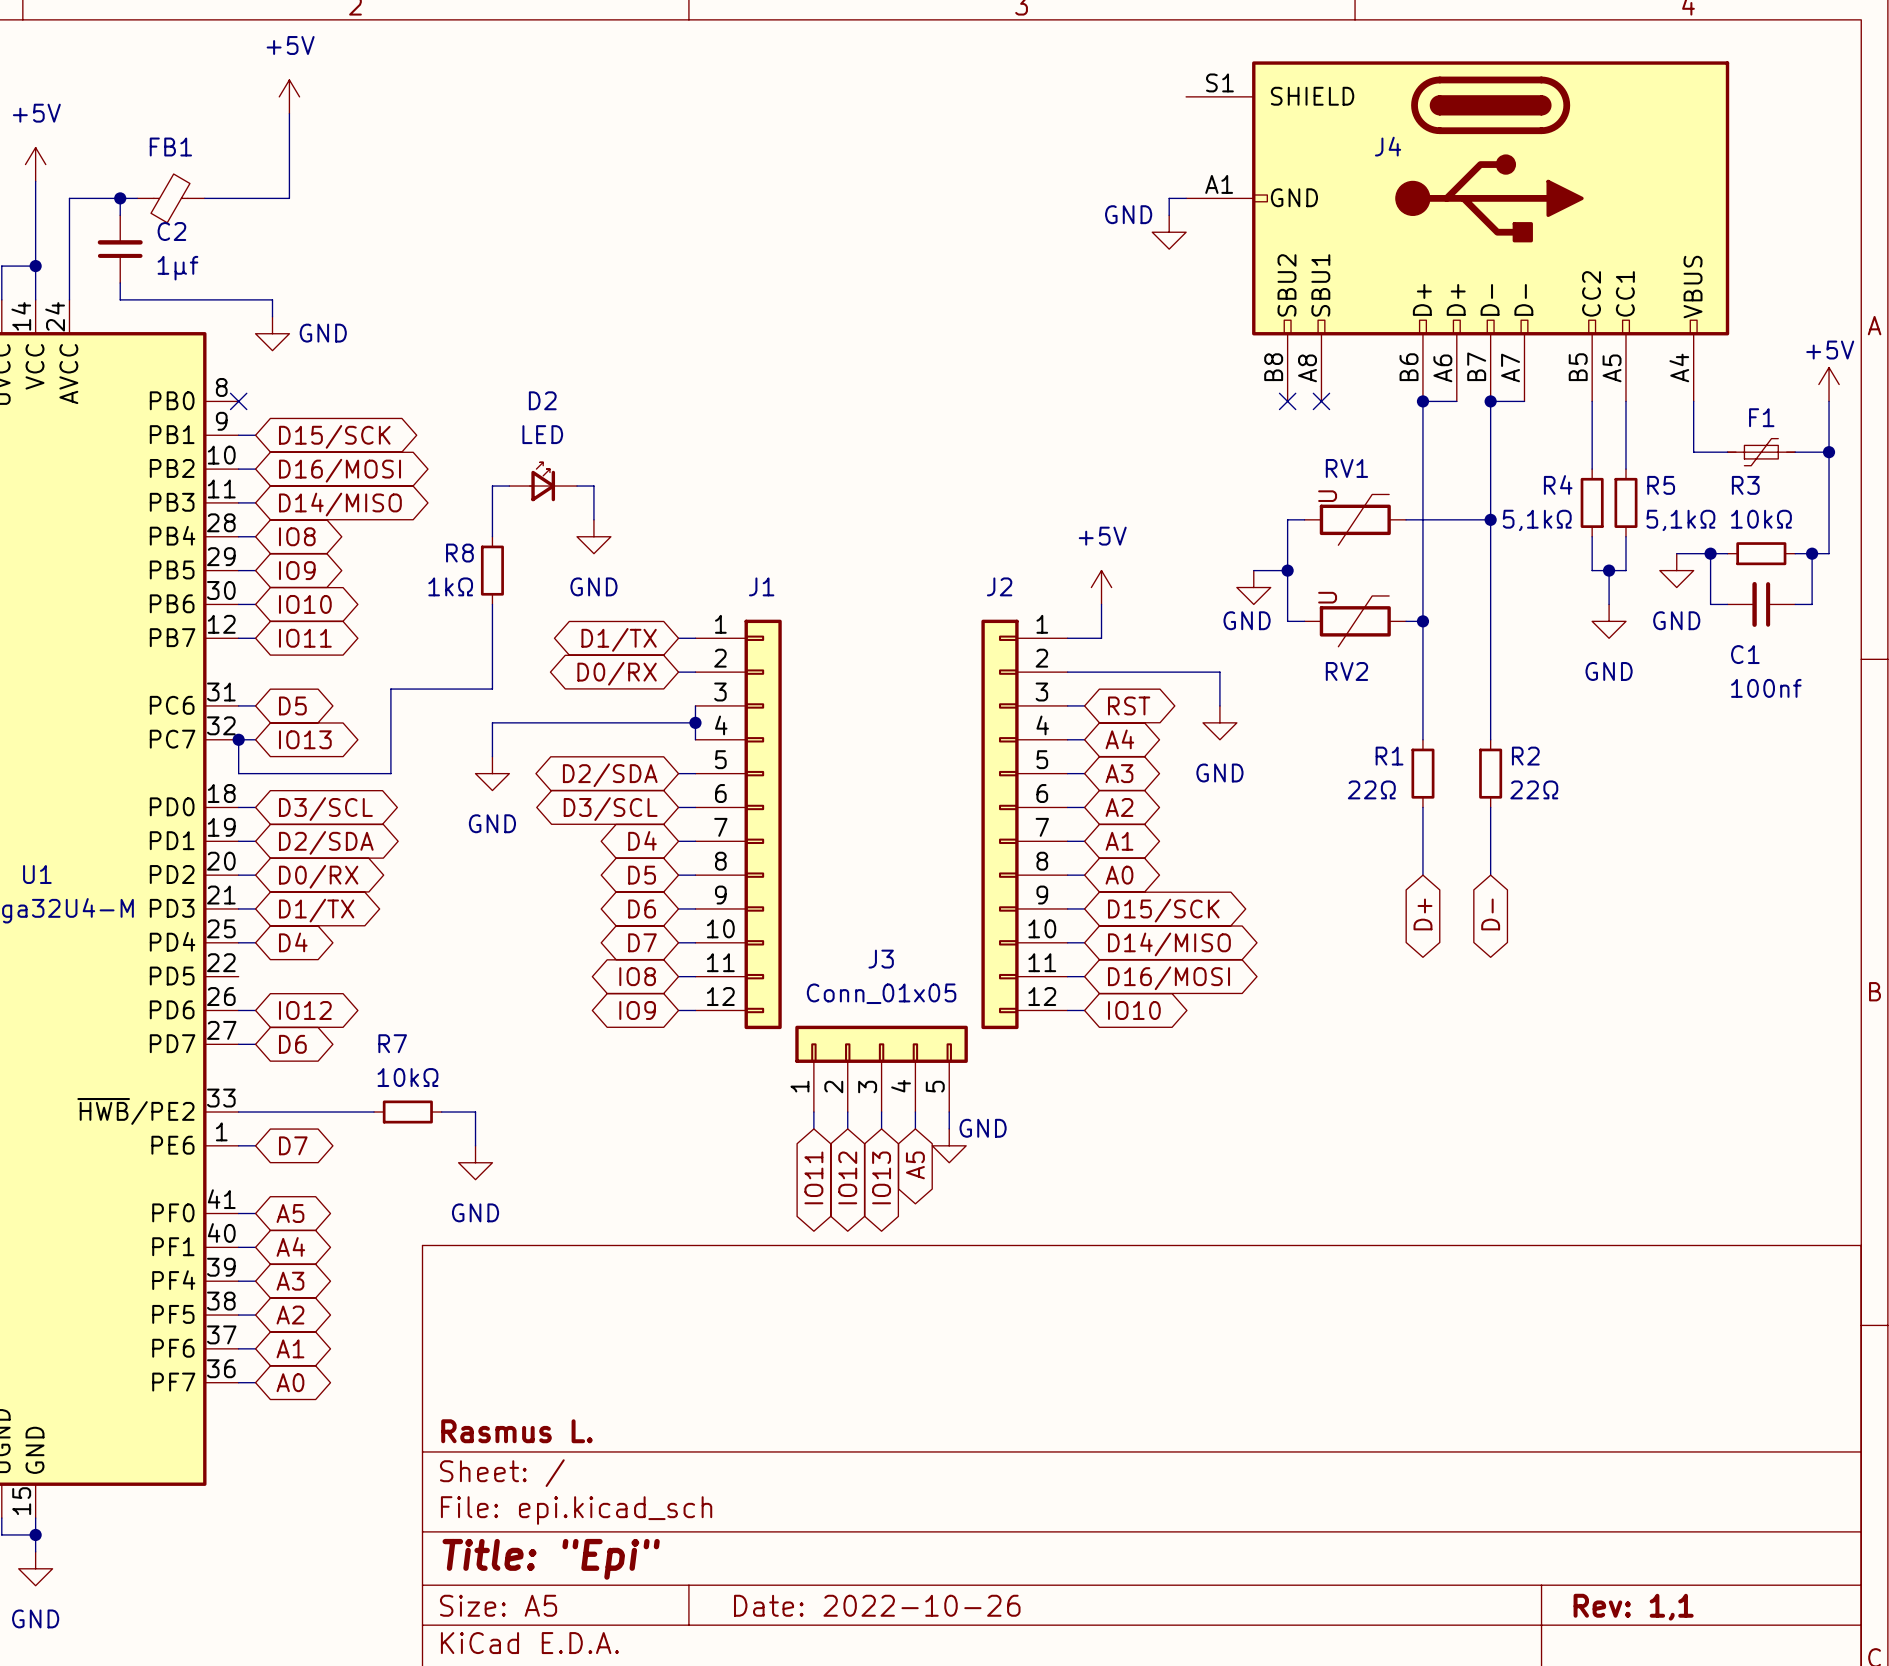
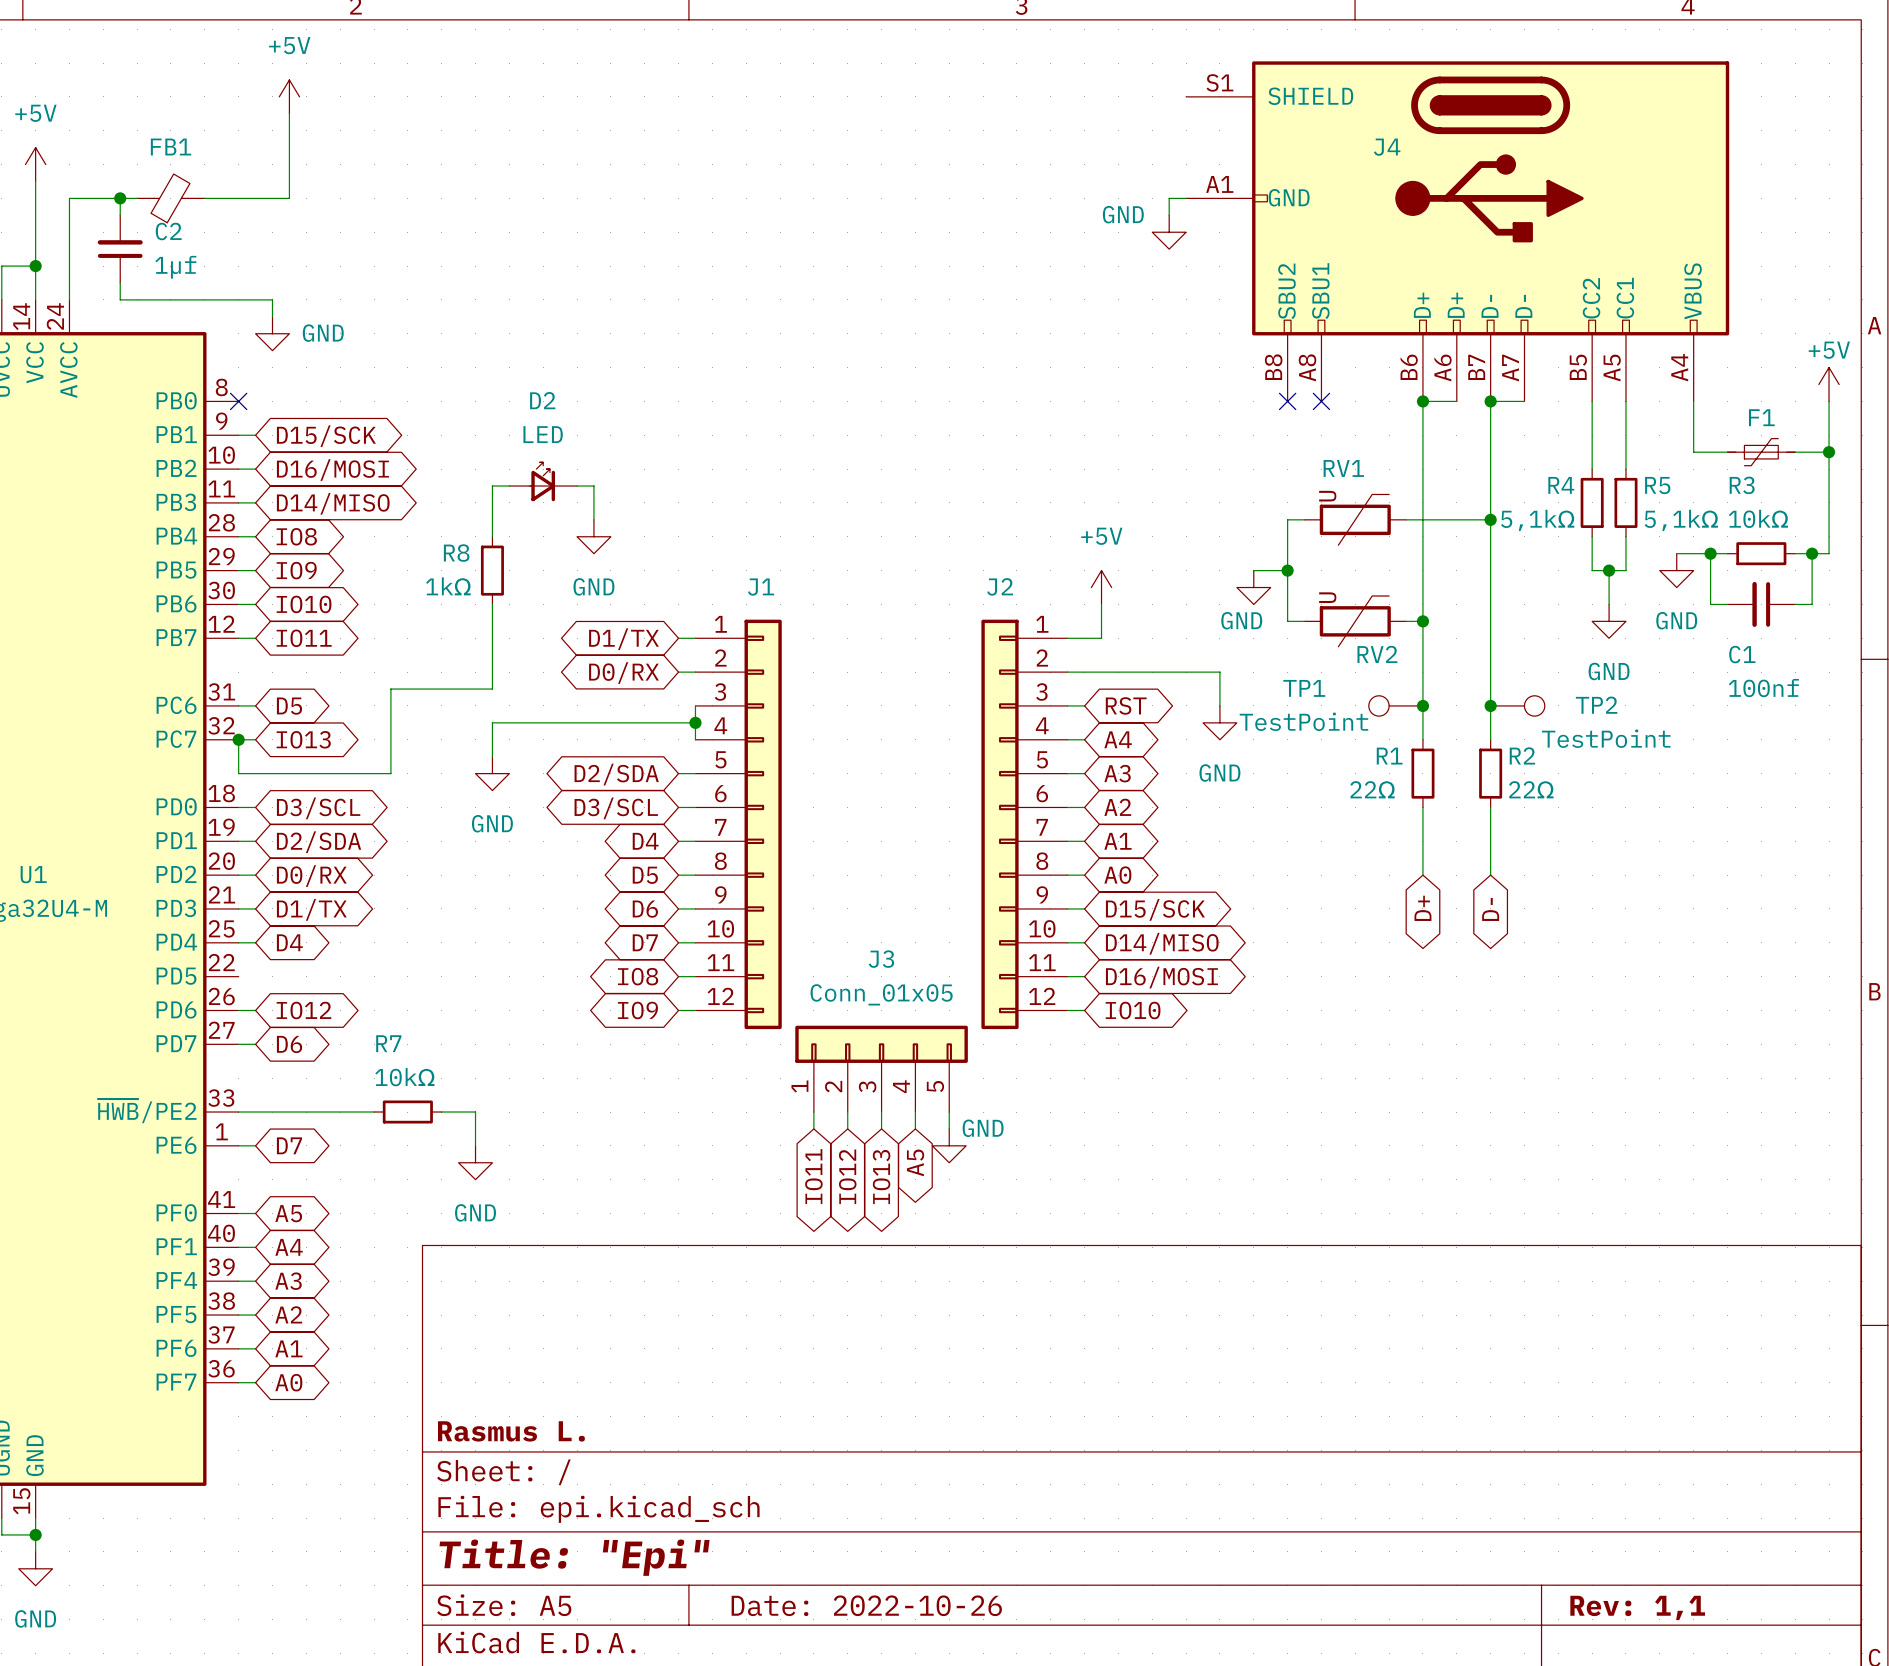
RV2 name position: RV2 (1346, 671) -> RV2 (1377, 654)
TP1: none -> TestPoint (1395, 705)
junction: none -> (1422, 705)
junction: none -> (1490, 705)
TP2: none -> TestPoint (1517, 705)

